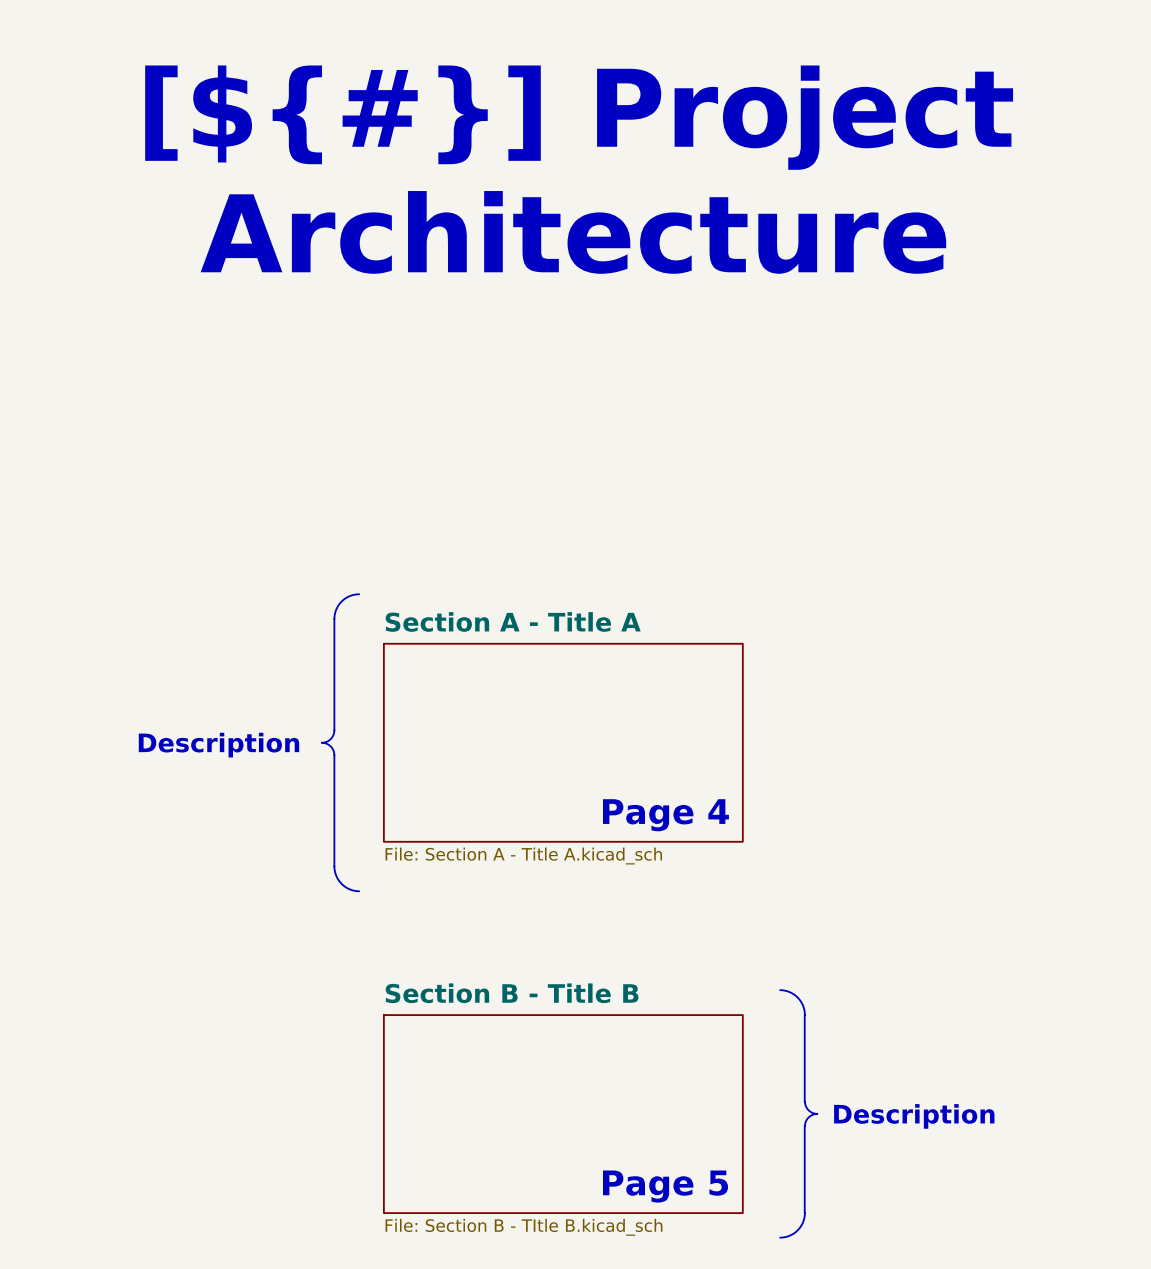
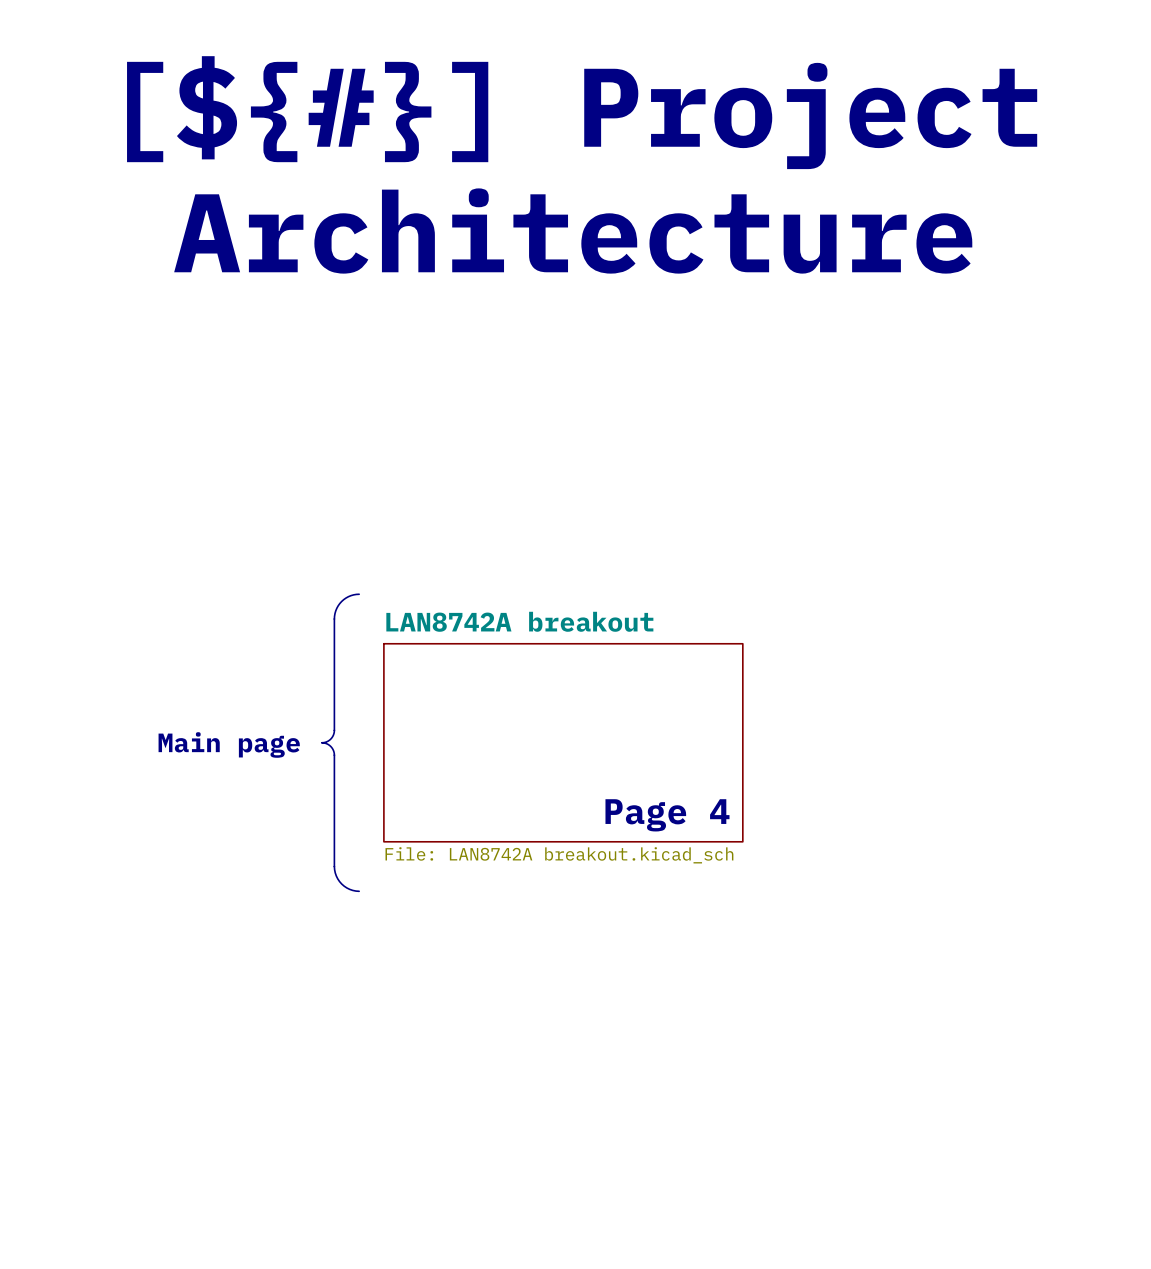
sheet Section A - Title A name: Section A - Title A (513, 621) -> LAN8742A breakout (519, 621)
text: Description (218, 745) -> Main page (229, 744)
sheet Section A - Title A value: File: Section A - Title A.kicad_sch (523, 856) -> File: LAN8742A breakout.kicad_sch (559, 855)
line: (780, 990) (789, 992) (797, 997) (802, 1005) (804, 1014) -> none
line: (804, 1015) (804, 1101) -> none
line: (804, 1101) (808, 1110) (817, 1113) (808, 1117) (804, 1126) -> none
sheet Section B - Title B: File: Section B - TItle B.kicad_sch (563, 1114) -> none
text: Description (914, 1116) -> none
line: (804, 1126) (804, 1213) -> none
text: Page 5 (665, 1186) -> none
line: (804, 1212) (803, 1221) (797, 1230) (788, 1236) (780, 1237) -> none

